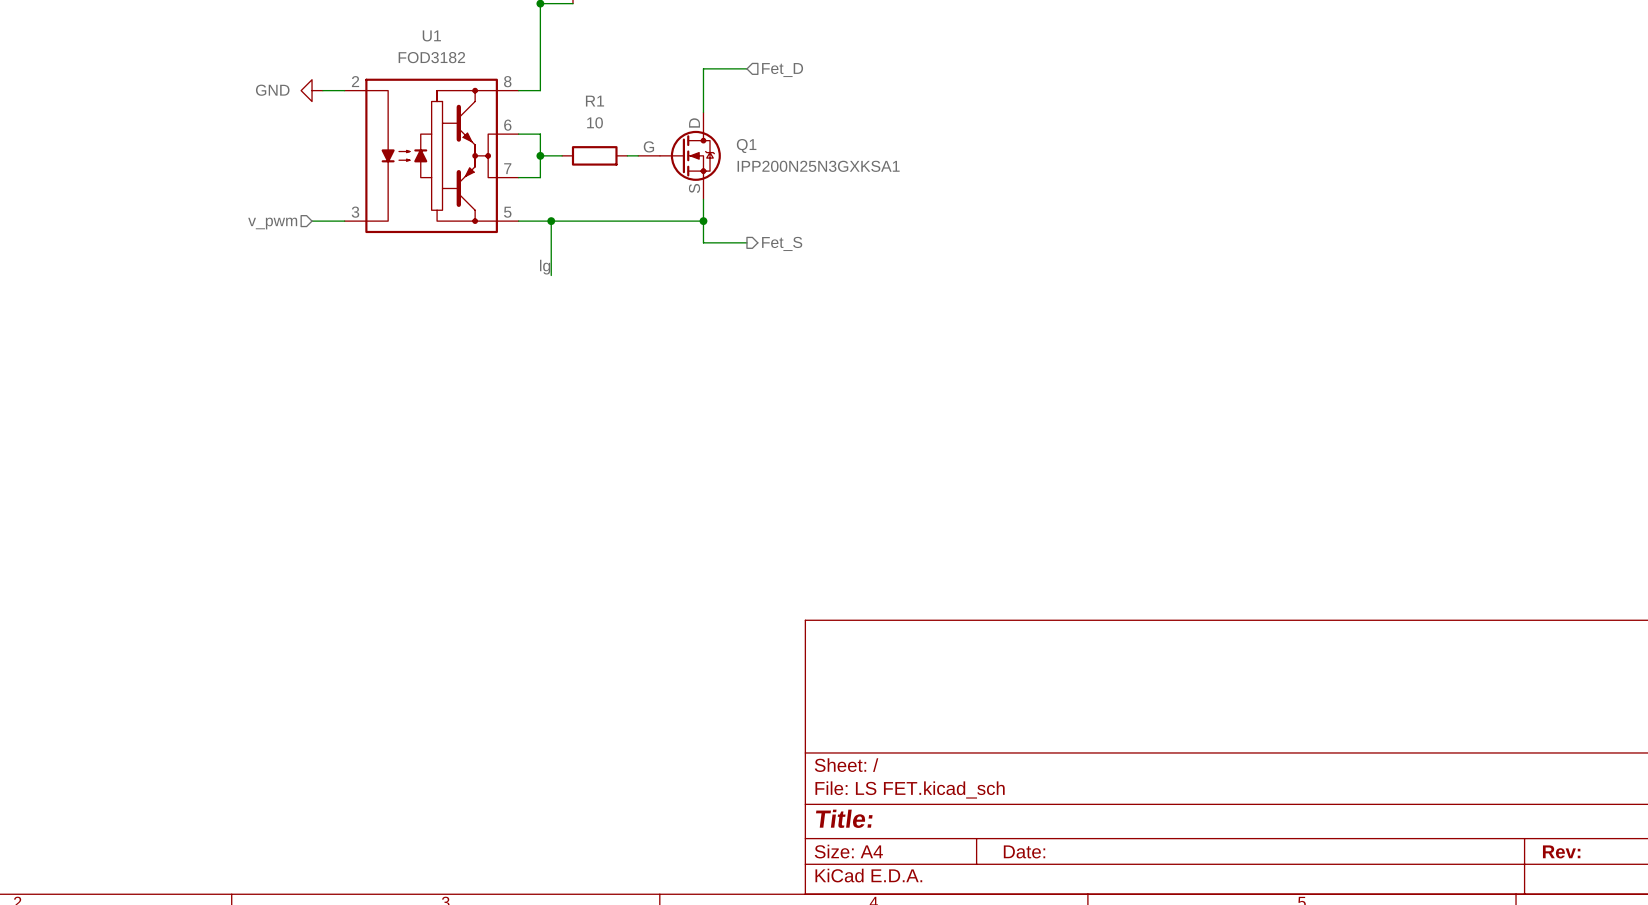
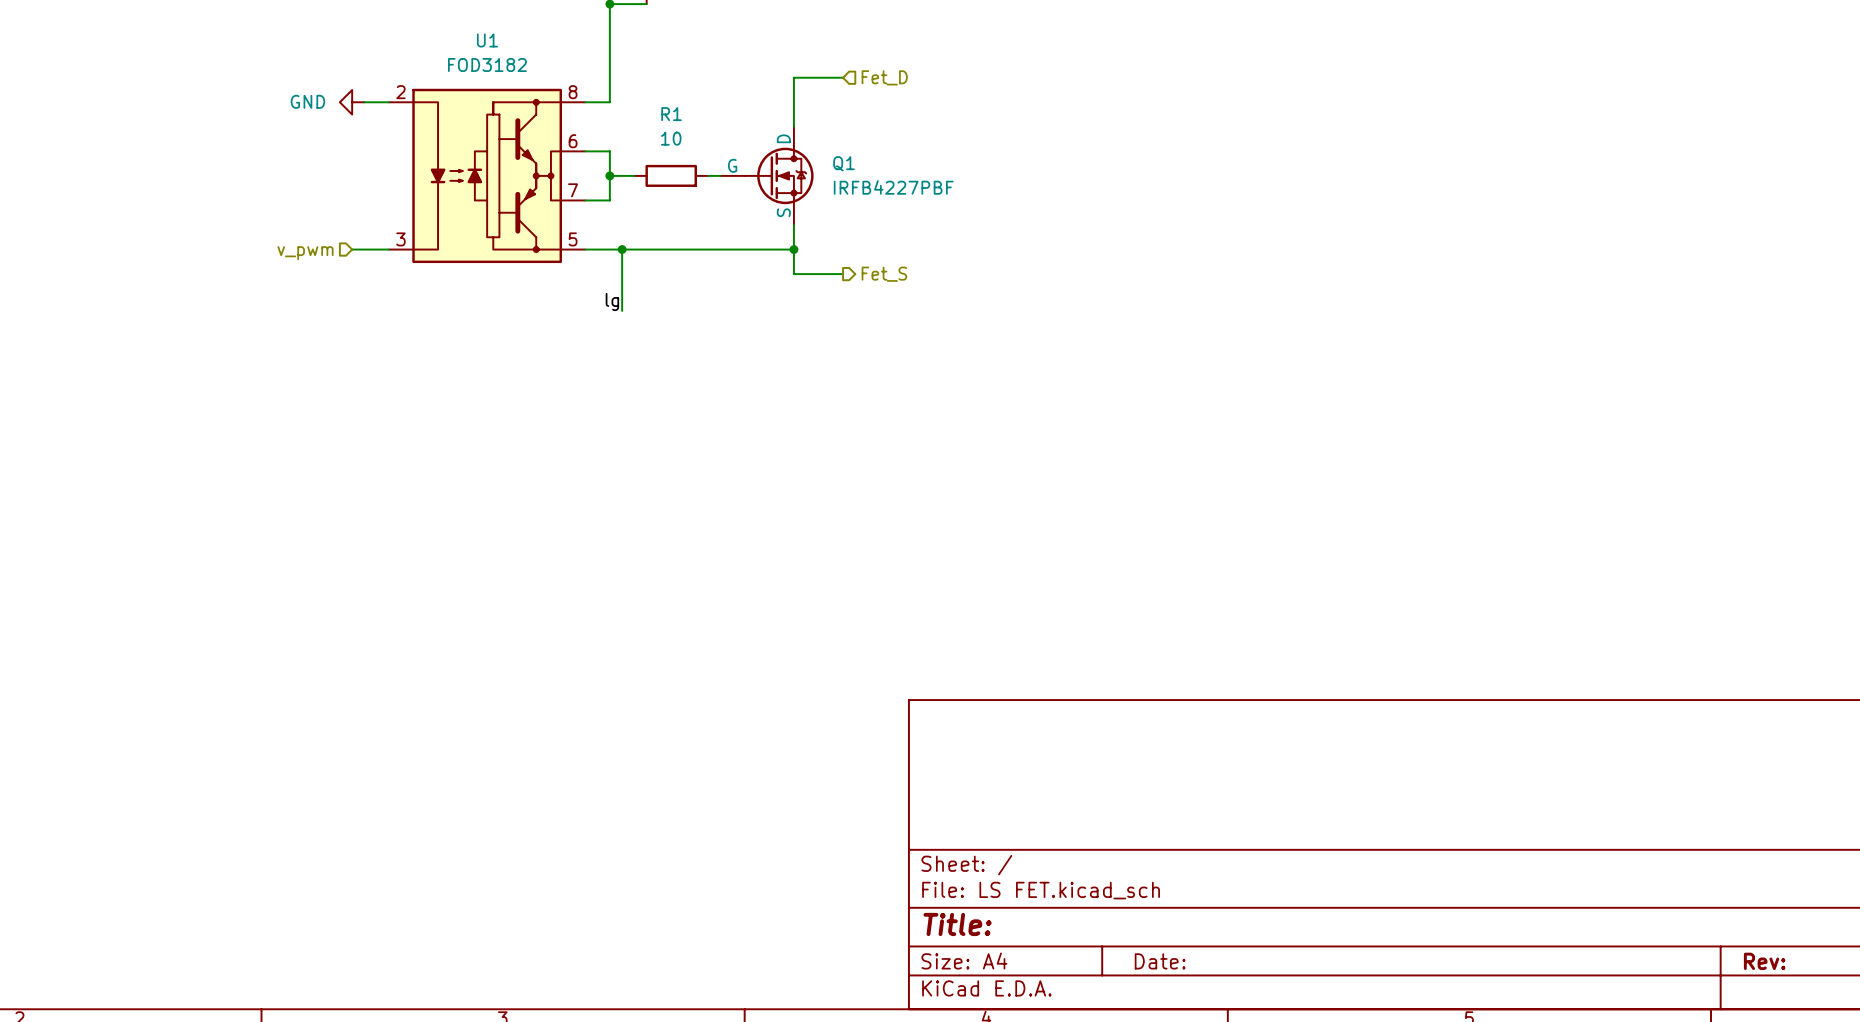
Q1 value: IPP200N25N3GXKSA1 (818, 166) -> IRFB4227PBF (893, 187)

